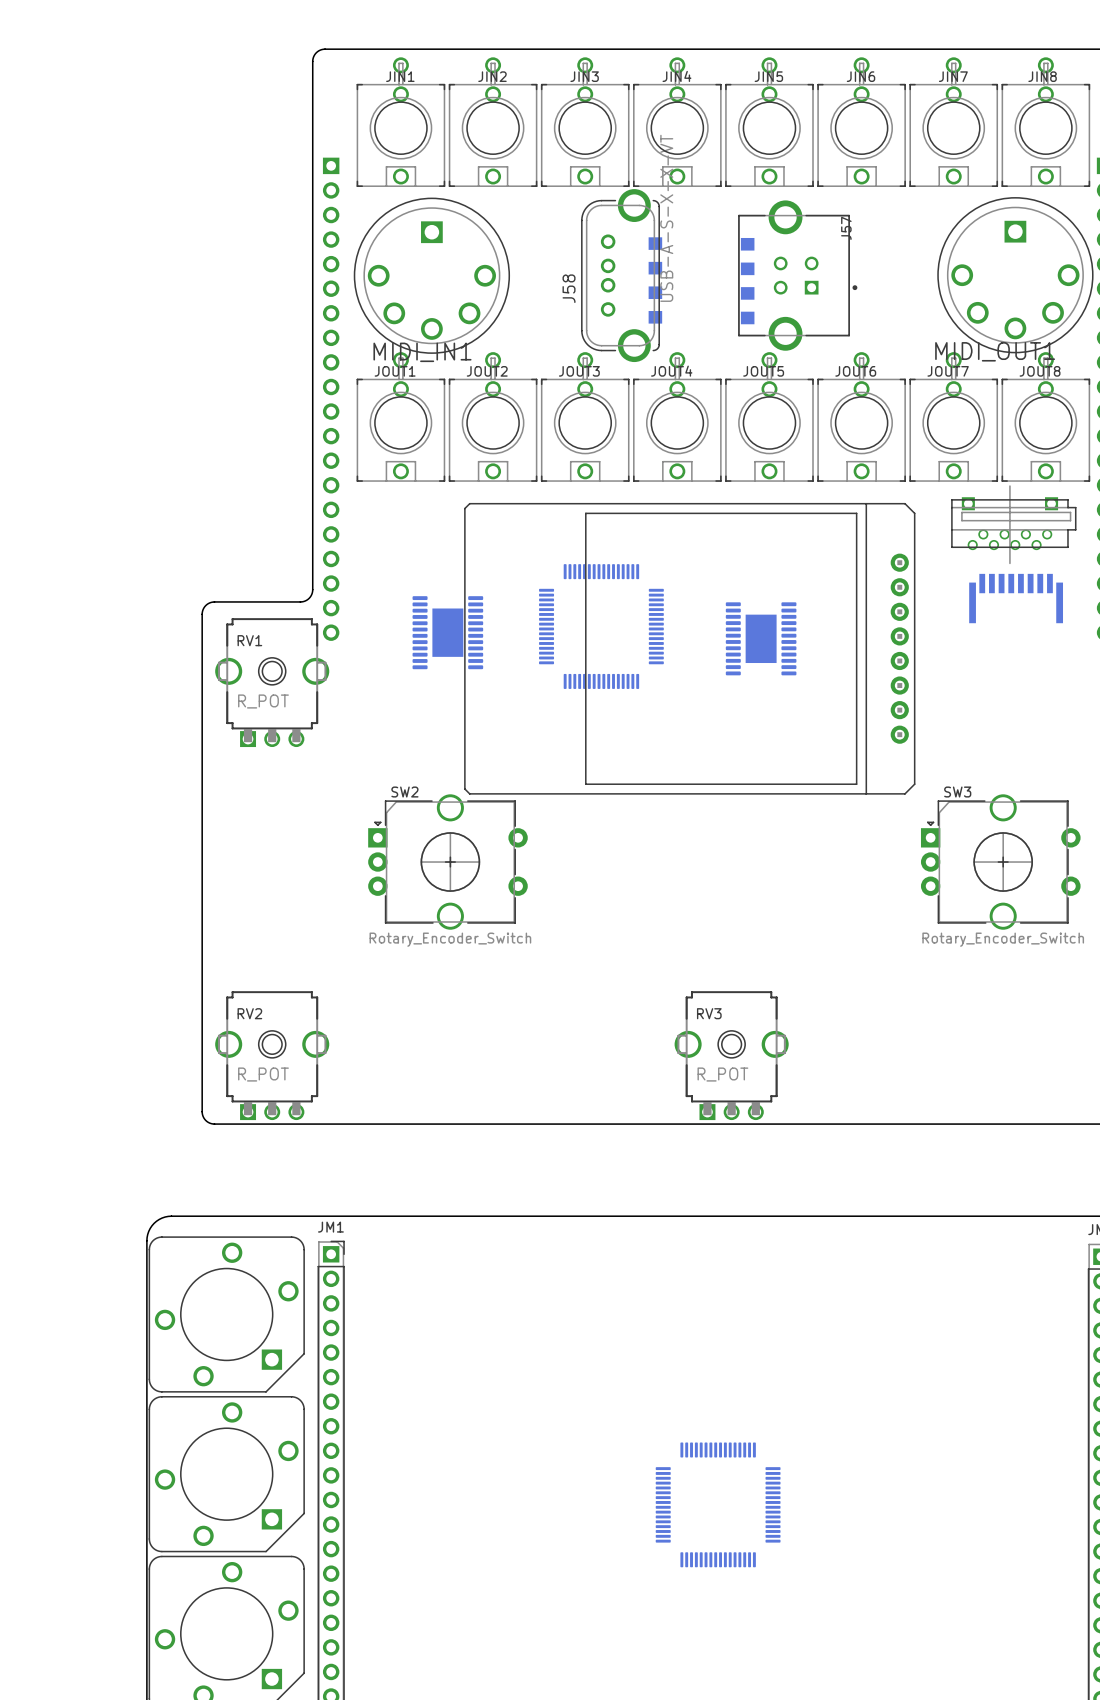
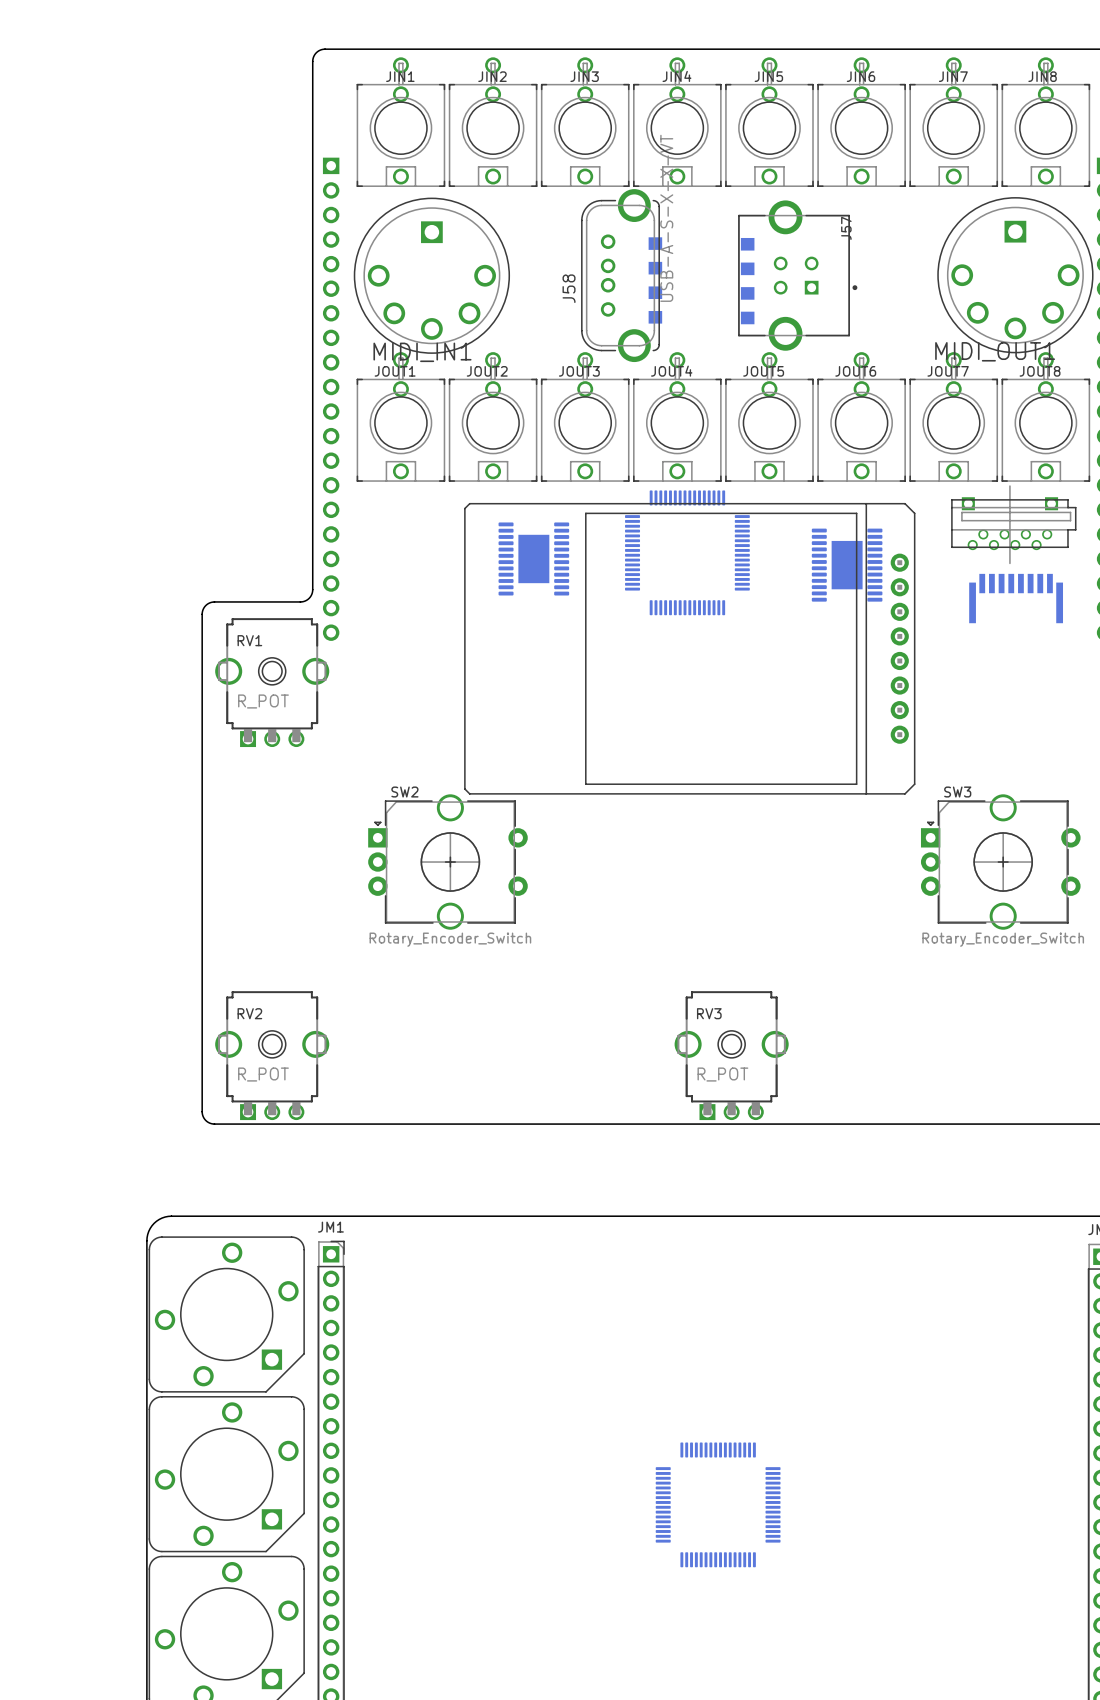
part position: (601, 626) -> (687, 552)
part position: (447, 632) -> (533, 558)
part position: (761, 638) -> (847, 565)

